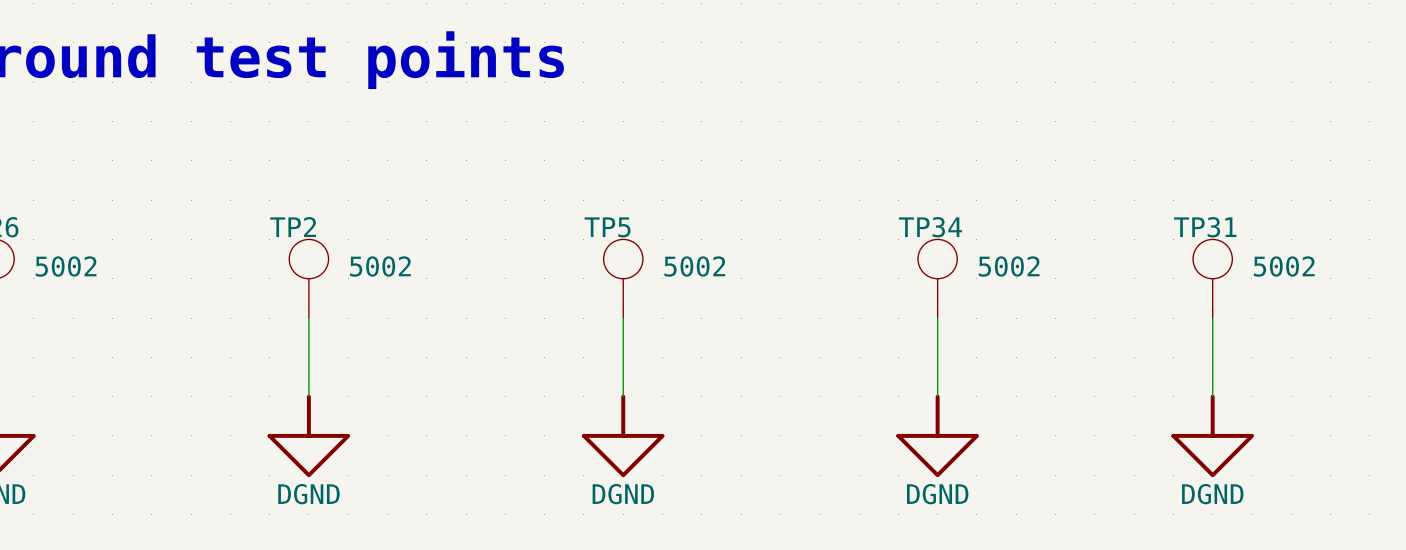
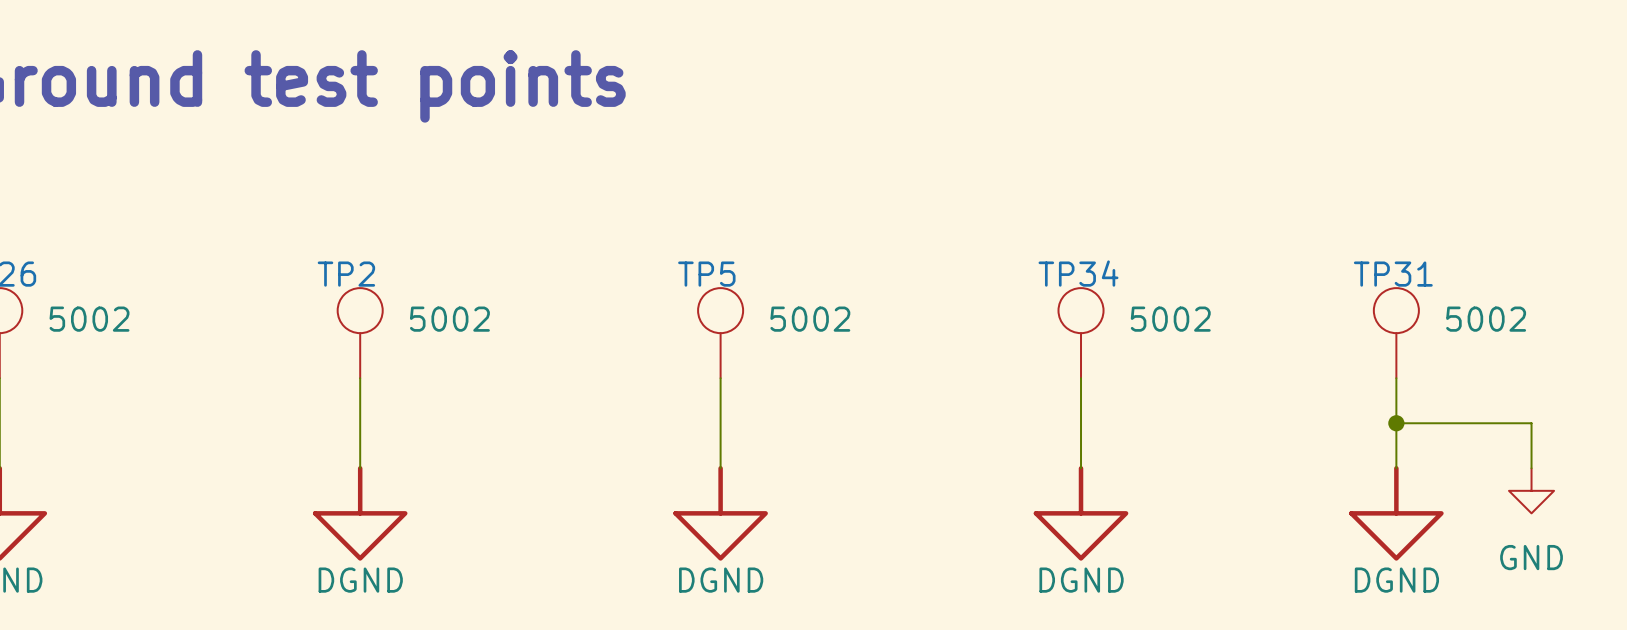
wire: none -> (1396, 423) (1531, 423) (1531, 468)
junction: none -> (1396, 423)
power symbol: none -> GND (1531, 490)

